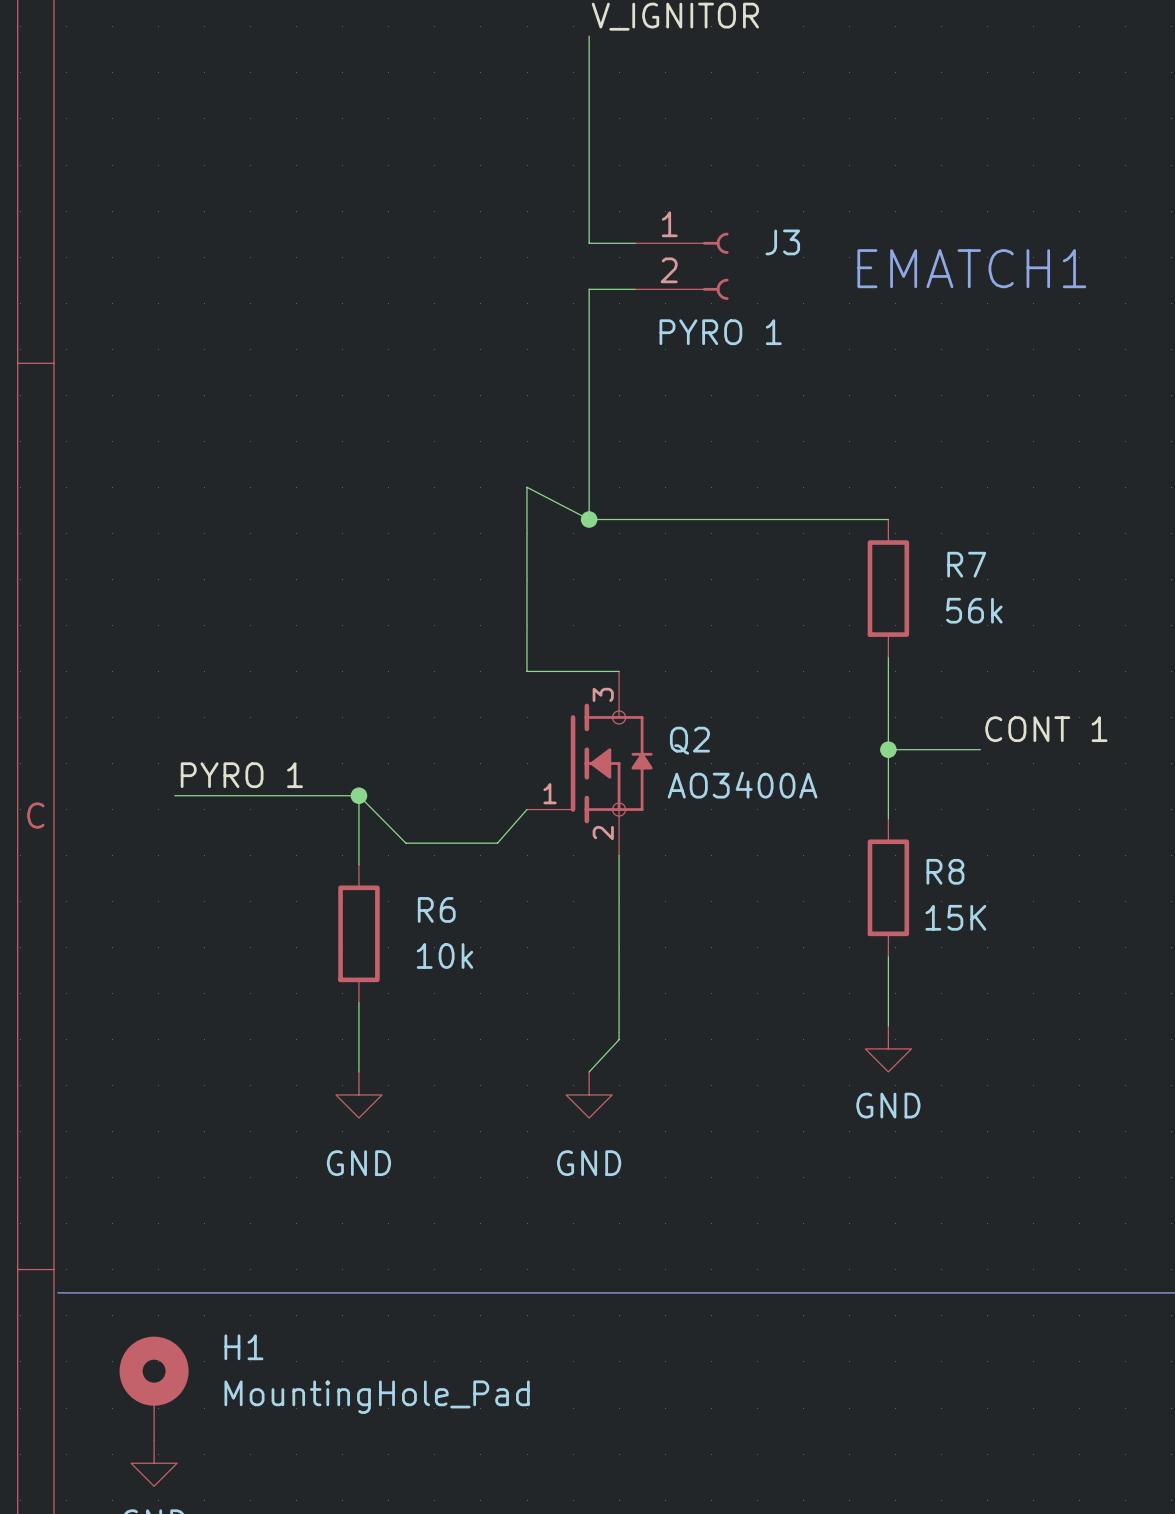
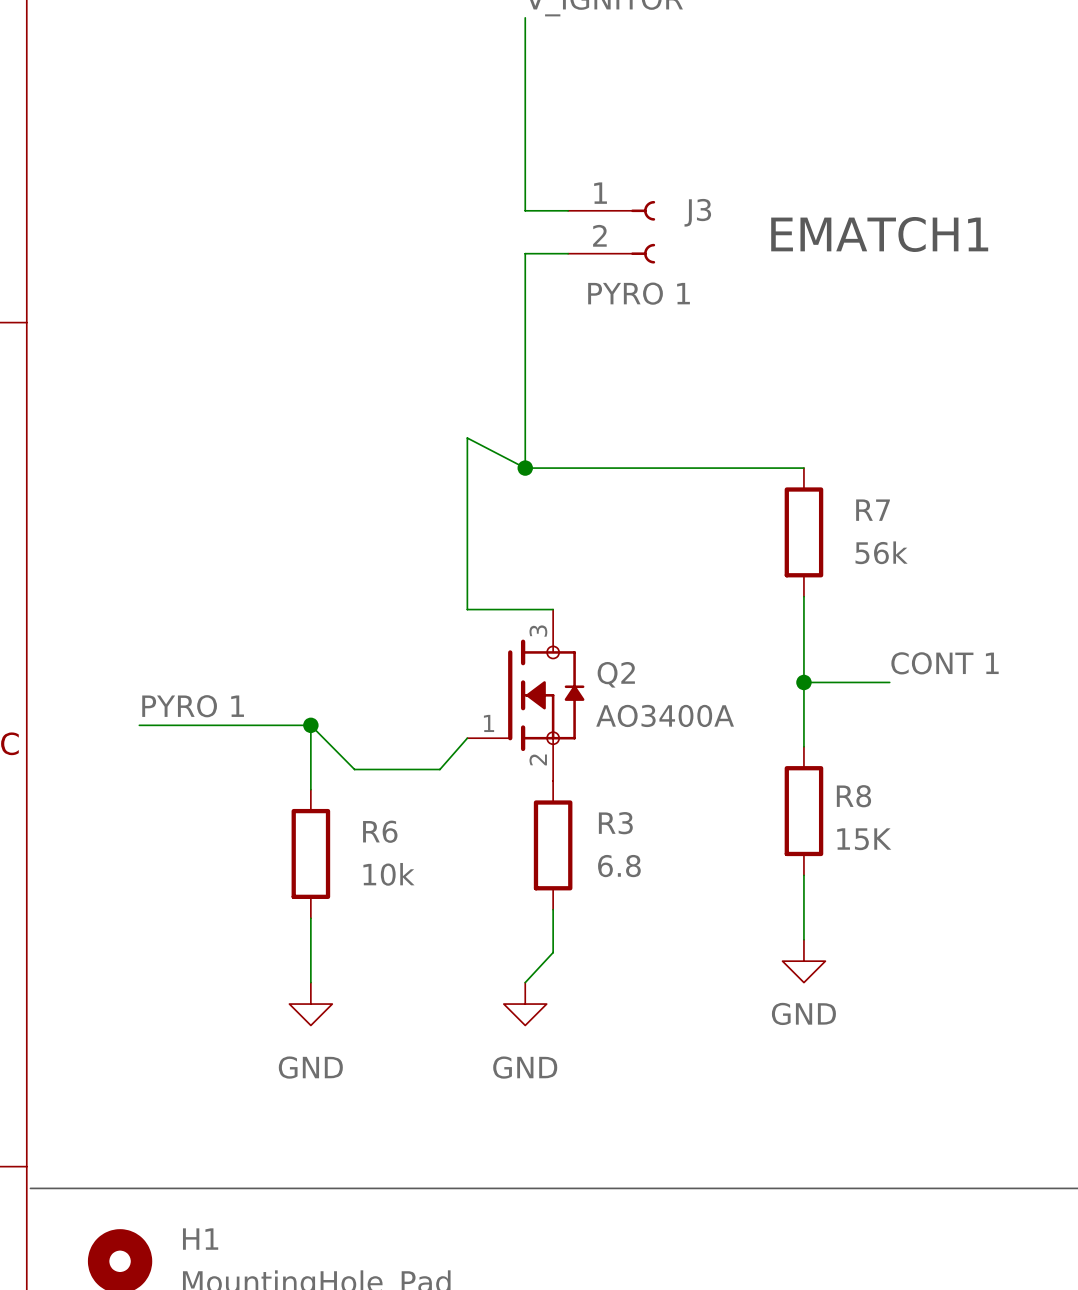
wire: (619, 855) (619, 993) -> none
R3: none -> 6.8 (553, 845)

